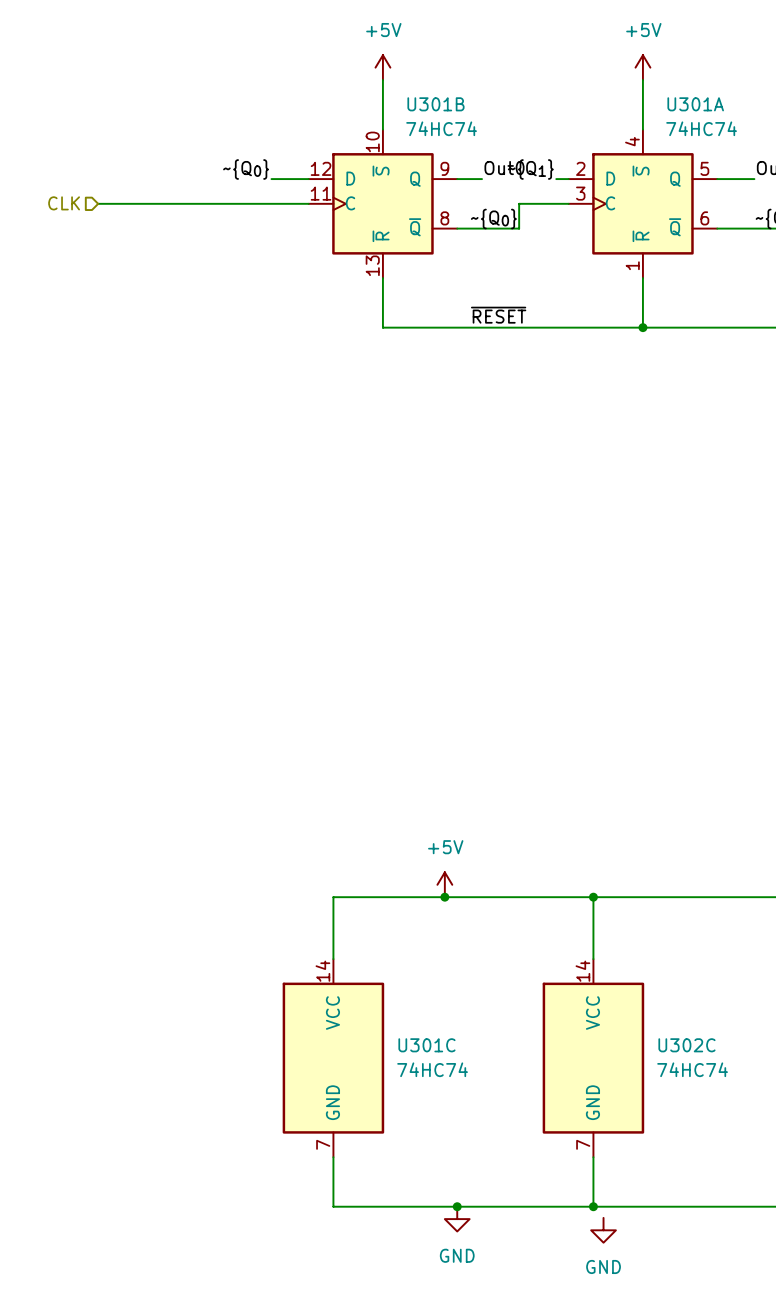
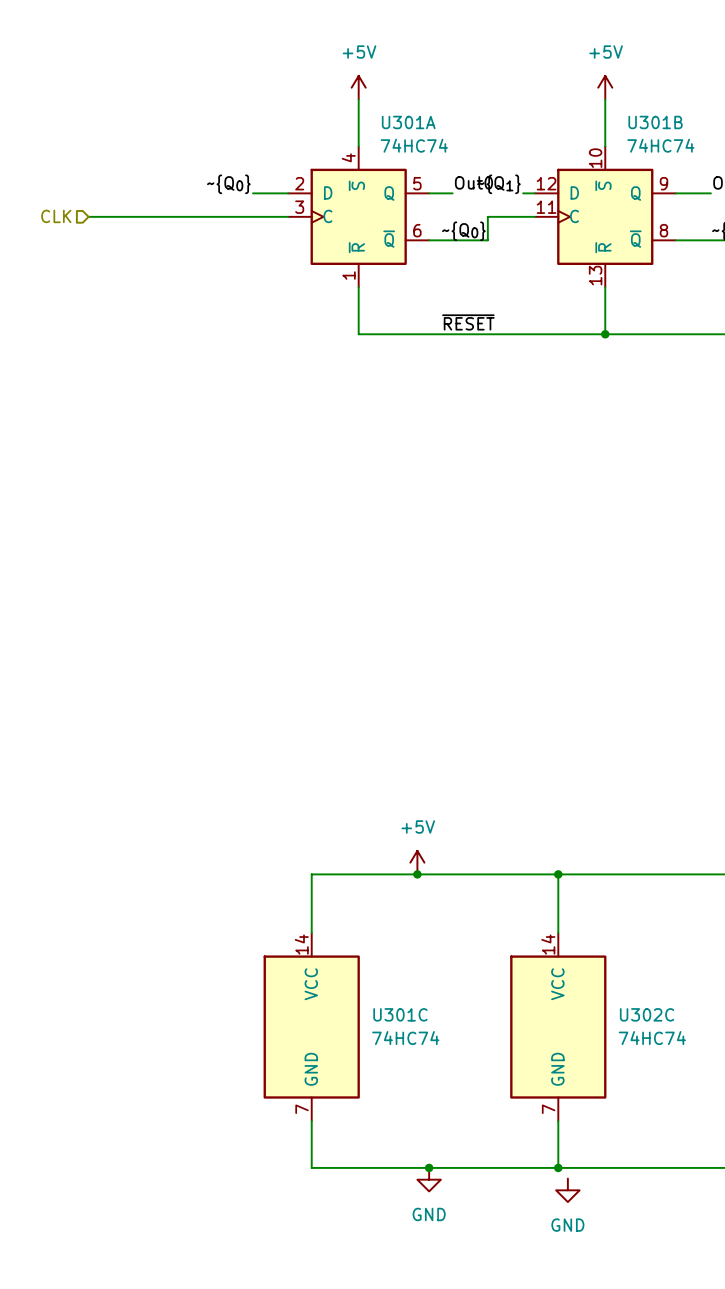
U301B position: (382, 203) -> (605, 216)
U301A position: (642, 203) -> (358, 216)

